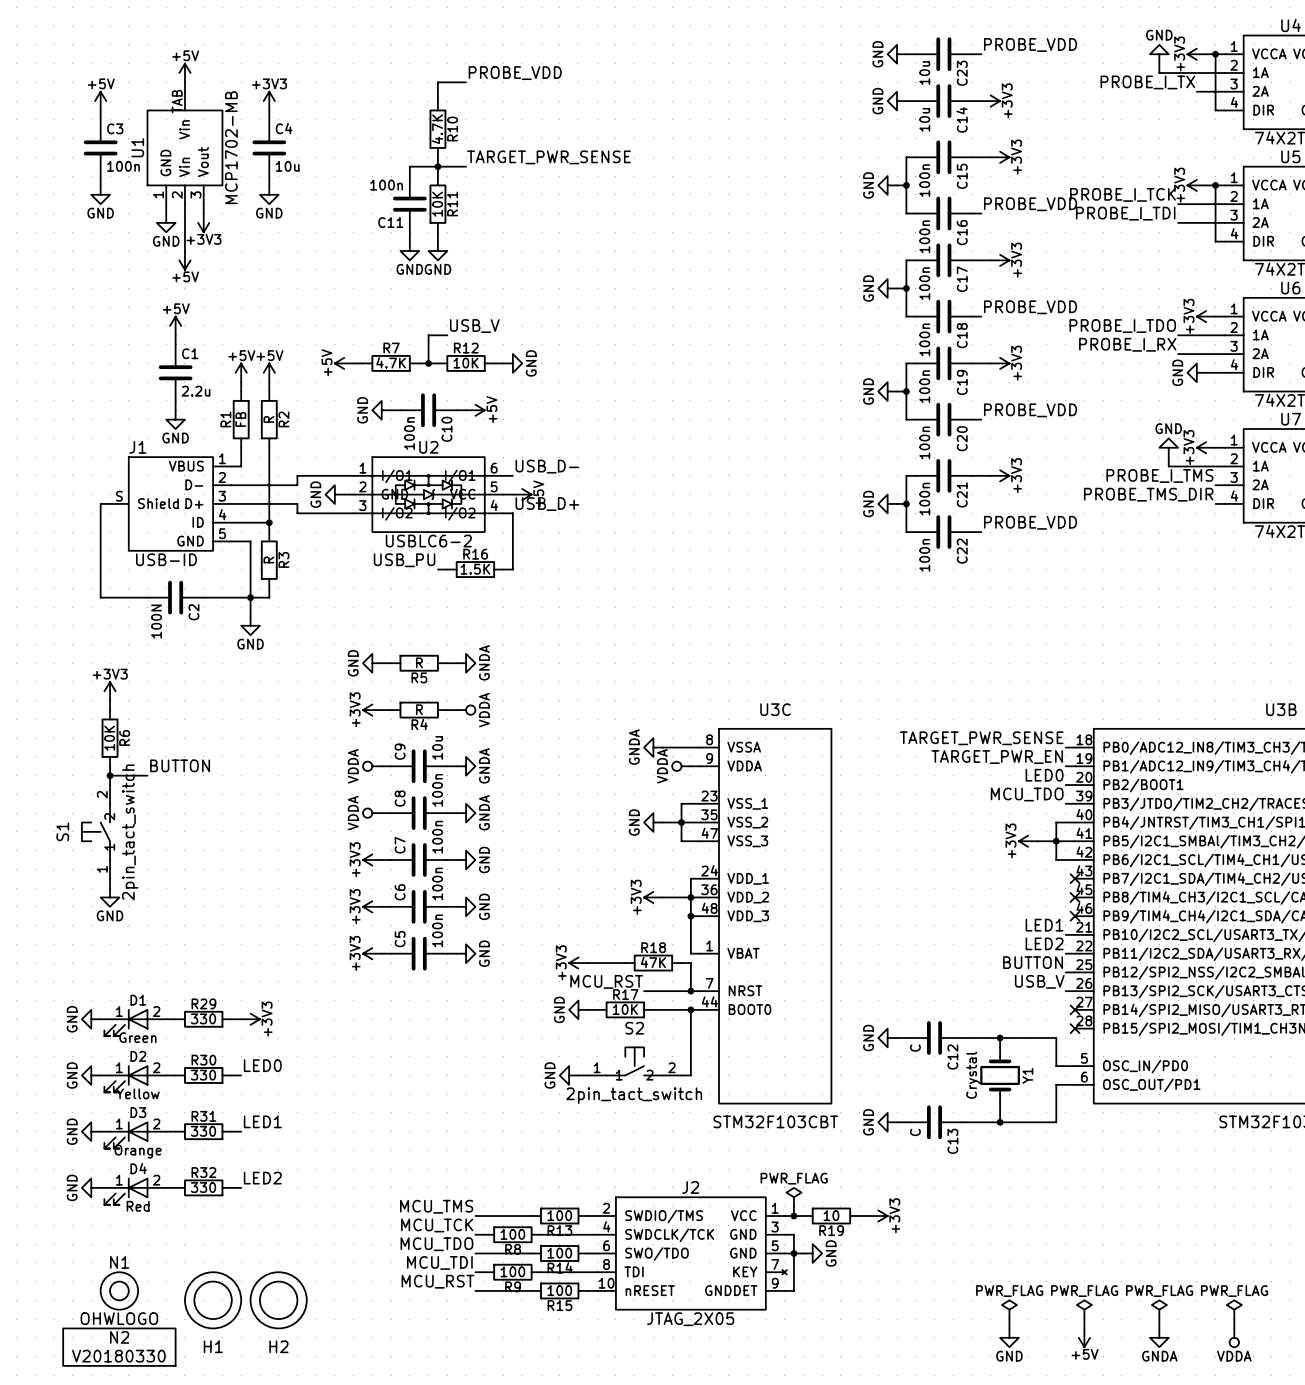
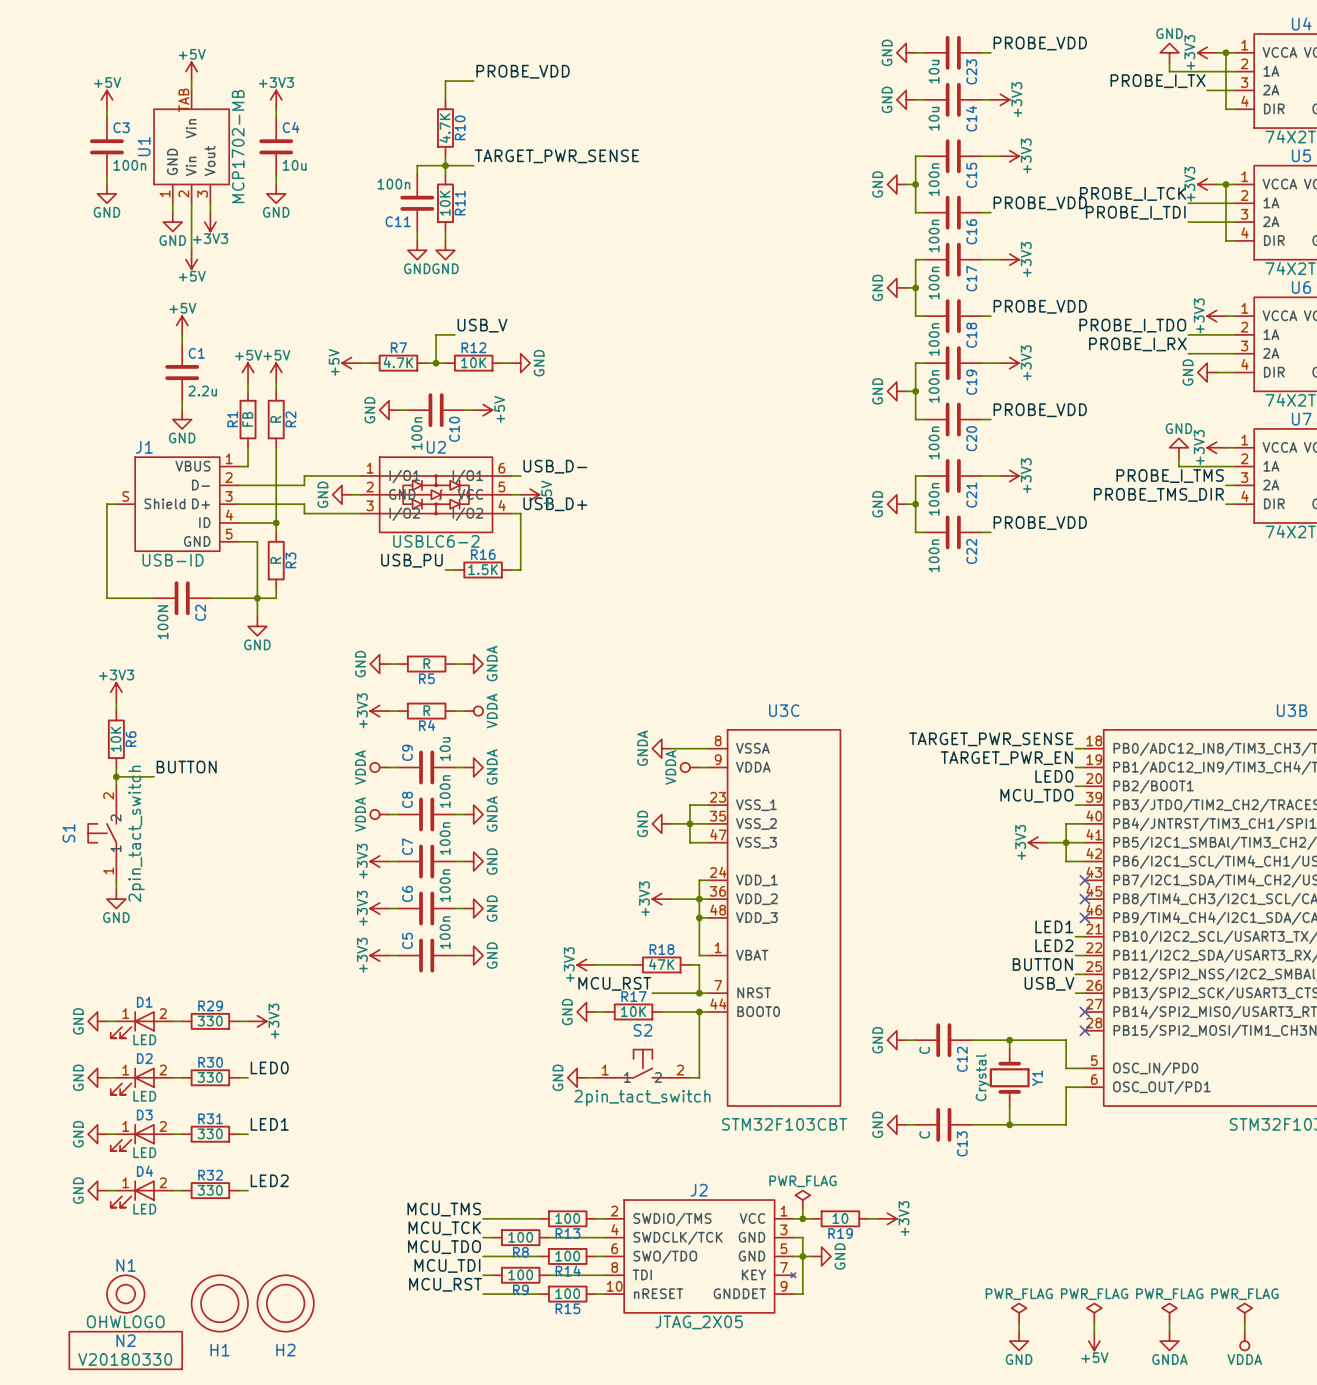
D1 value: Green (137, 1037) -> LED (144, 1039)
D2 value: Yellow (137, 1093) -> LED (144, 1096)
D3 value: Orange (138, 1151) -> LED (144, 1152)
D4 value: Red (138, 1206) -> LED (144, 1209)

